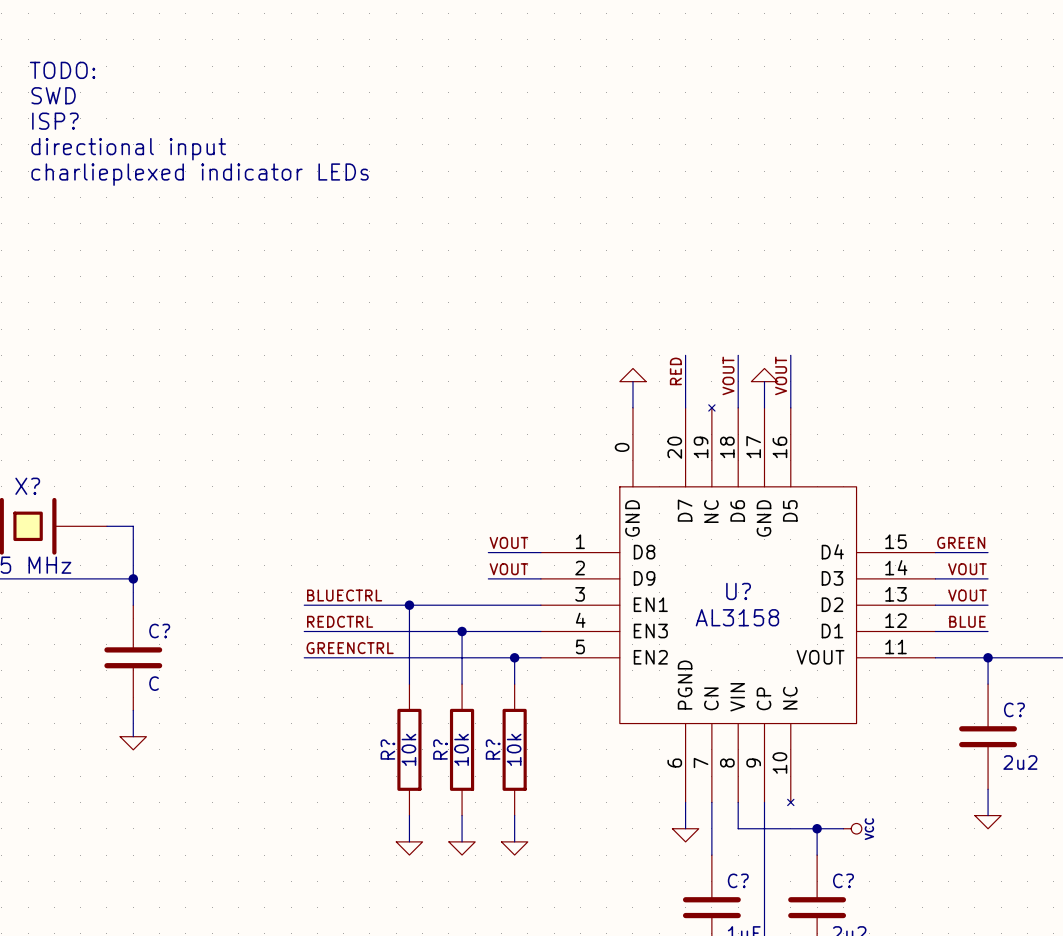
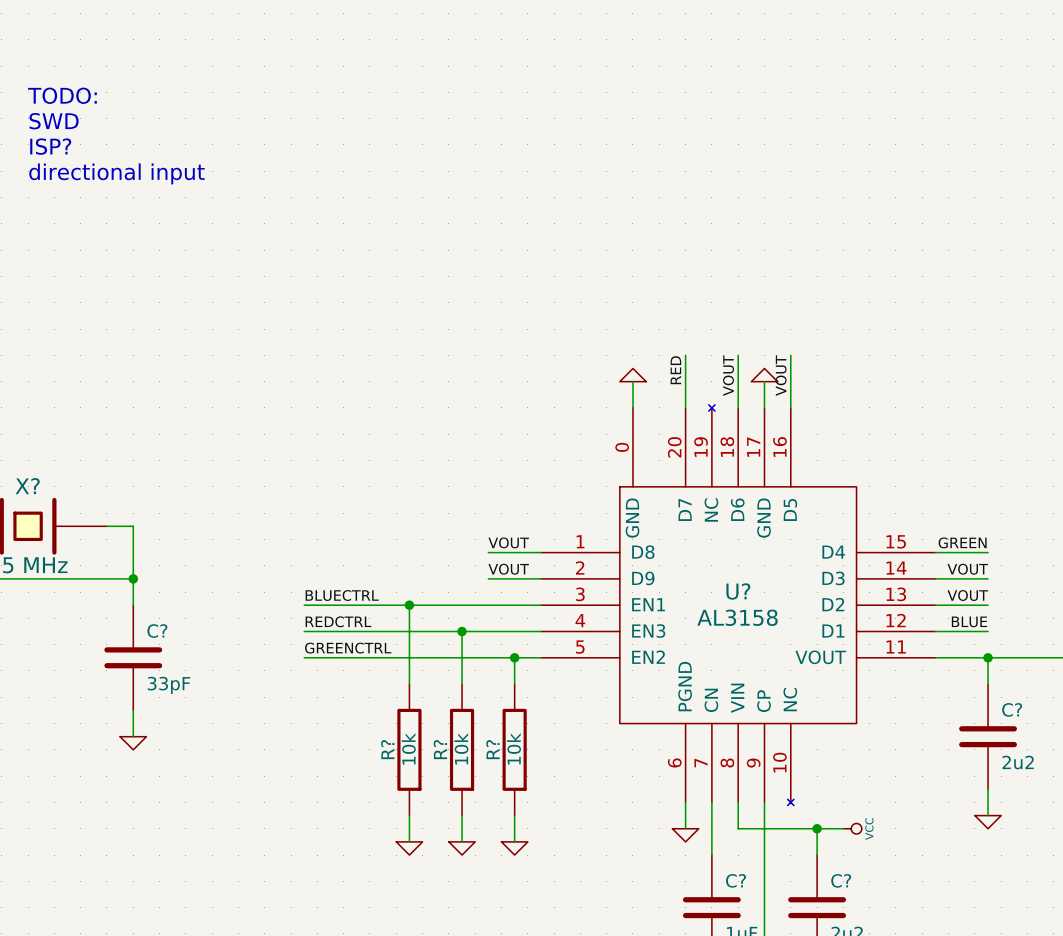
text: TODO: (62, 70) -> none
text: SWD (53, 95) -> TODO: (62, 95)
text: ISP? (55, 121) -> SWD (54, 121)
text: directional input (128, 149) -> ISP? (50, 146)
text: charlieplexed indicator LEDs (200, 174) -> directional input (117, 173)
C? value: C (154, 683) -> 33pF (168, 685)

